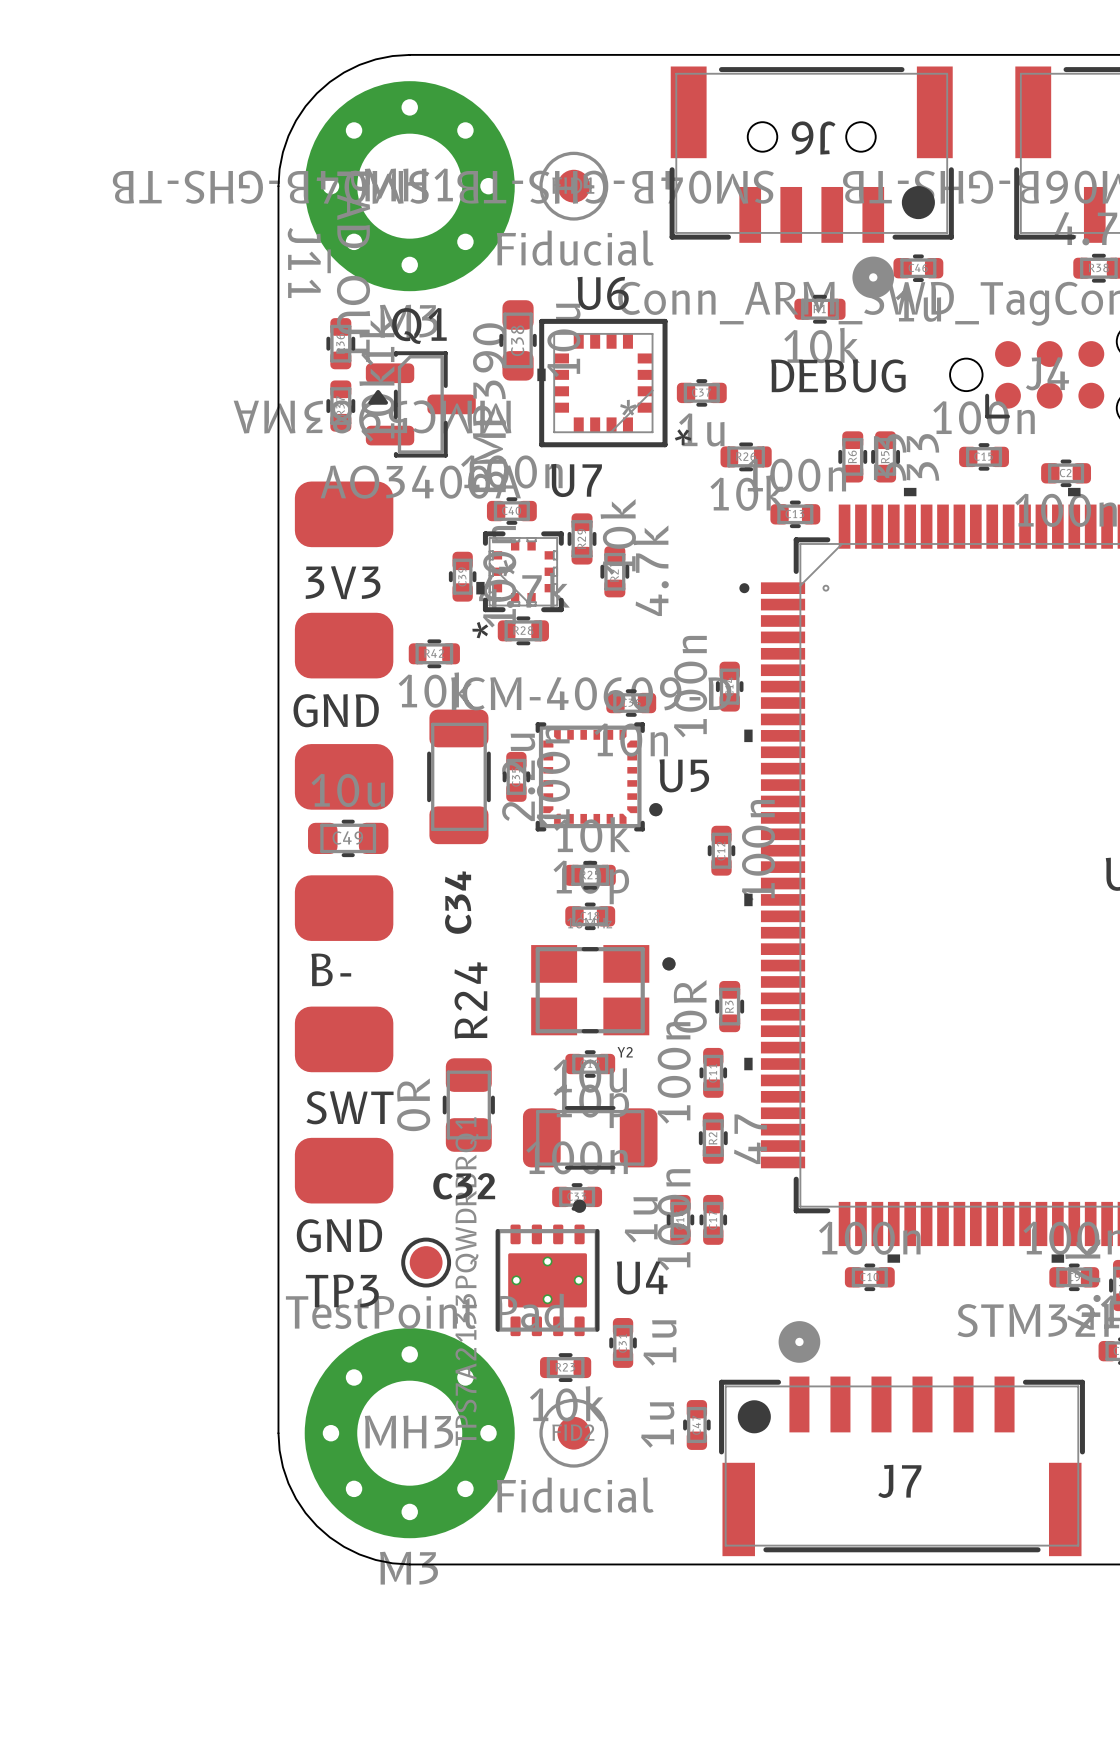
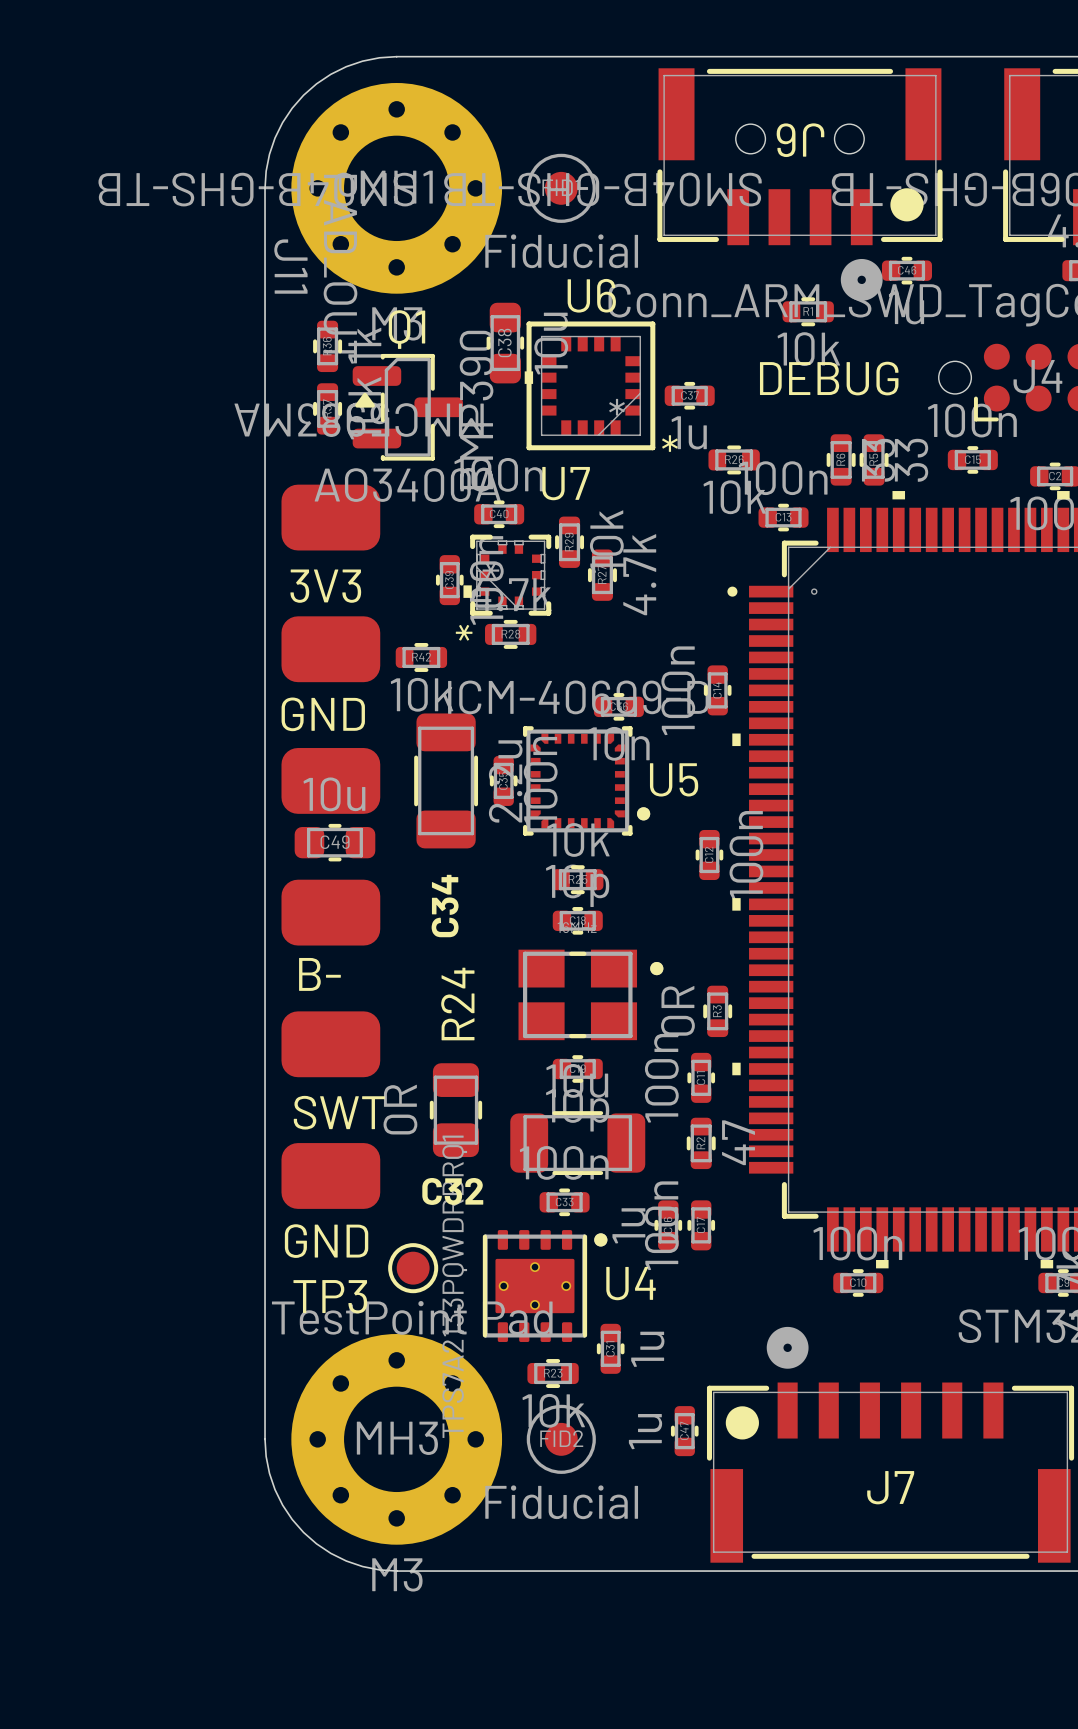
Y2 name: Y2 (625, 1052) -> none
U4 footprint: [495, 1199, 600, 1337] -> [482, 1230, 608, 1342]

